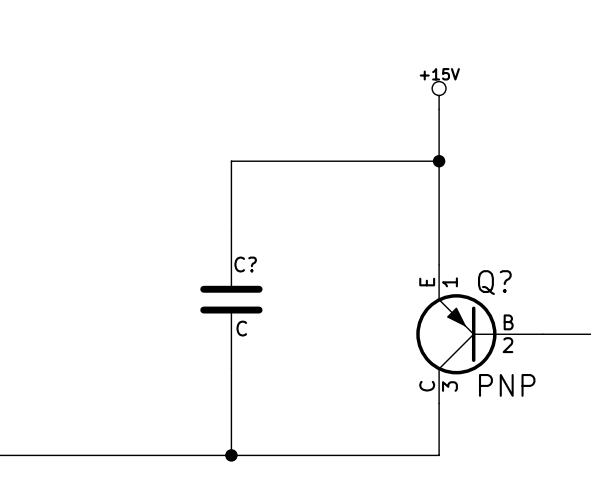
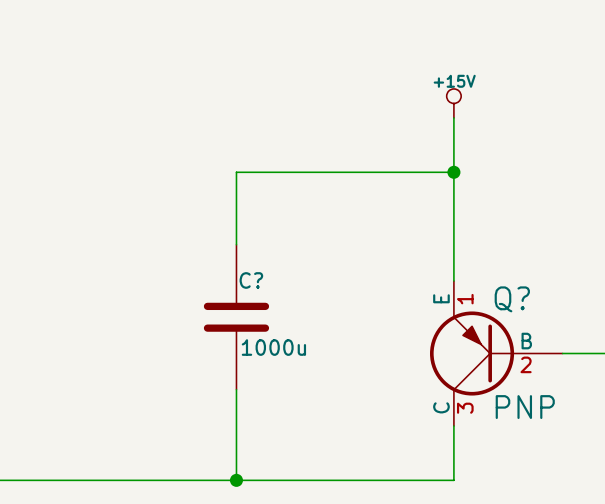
C? value: C (241, 328) -> 1000u (273, 347)

